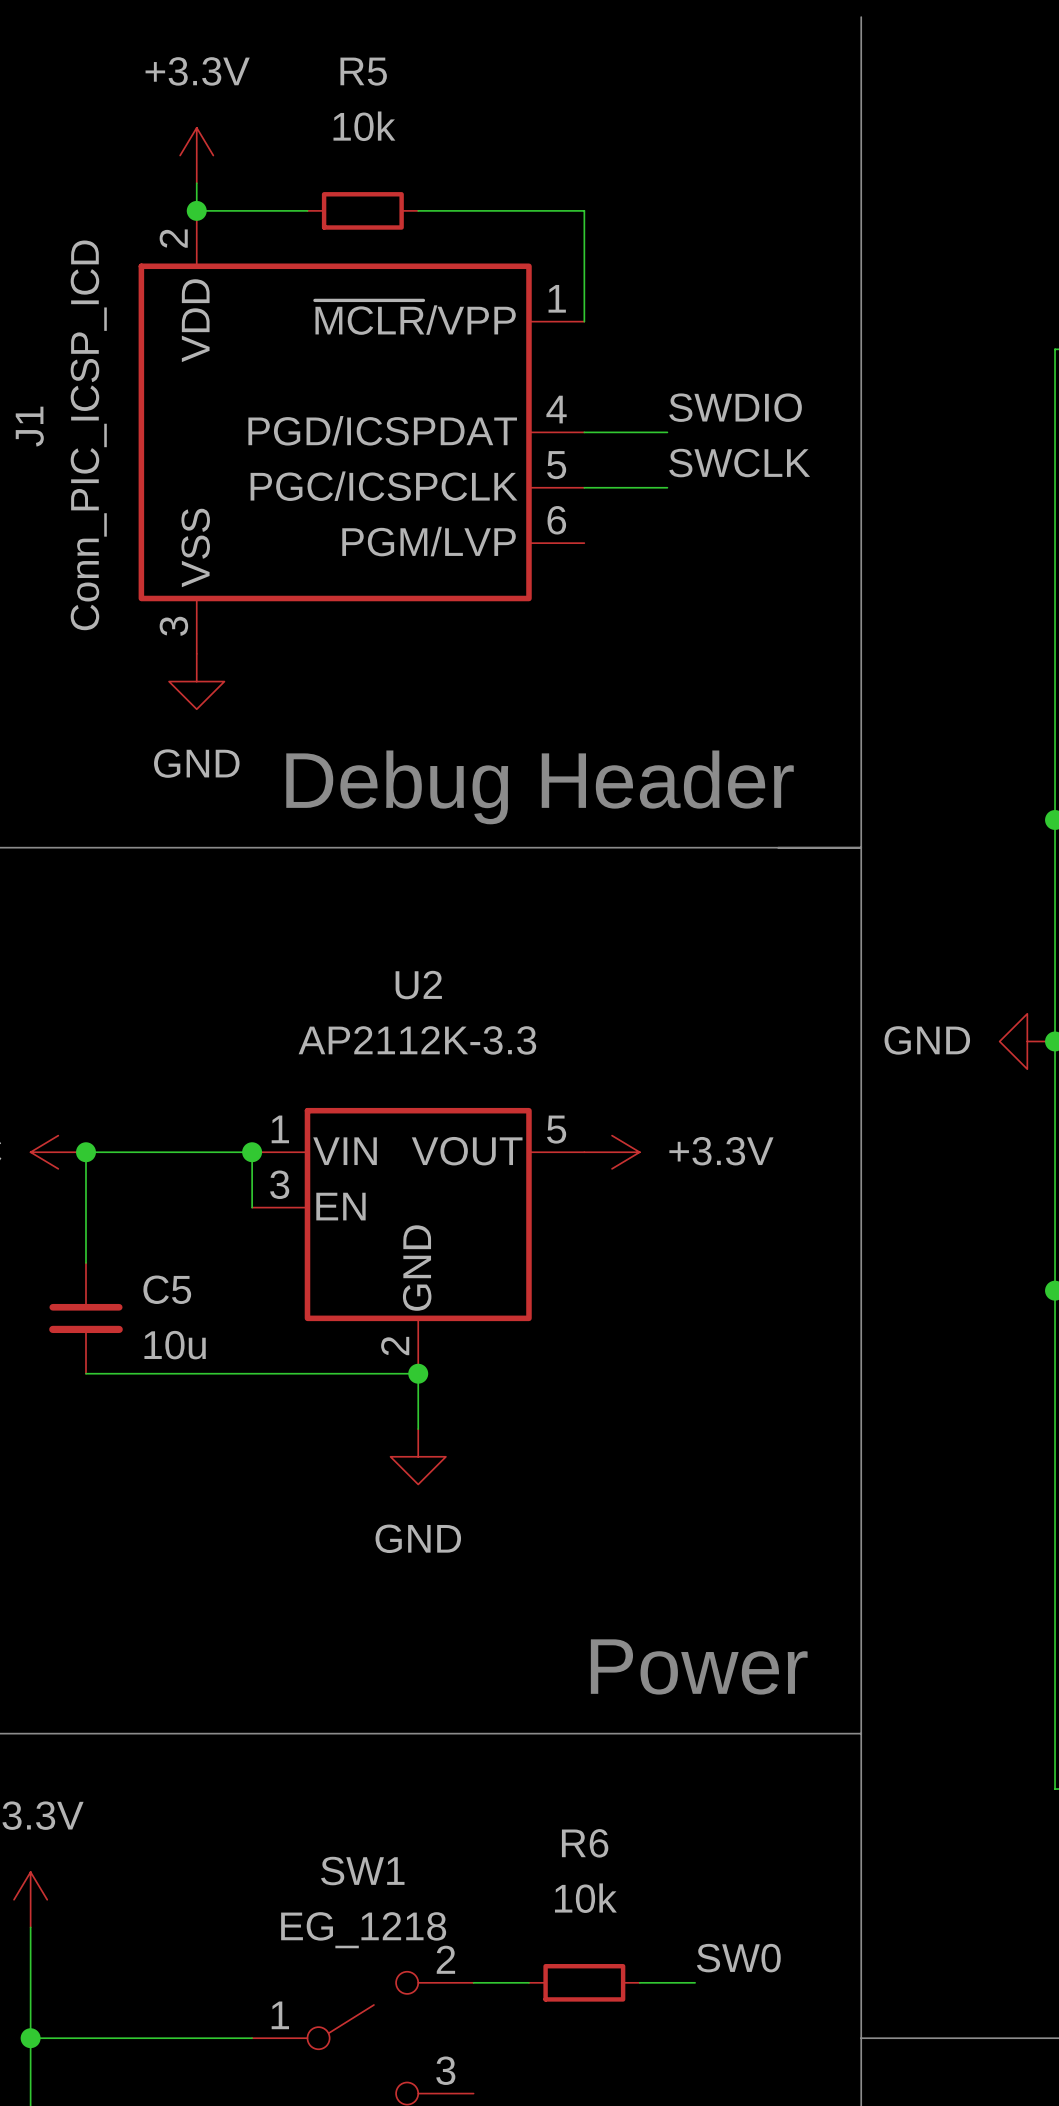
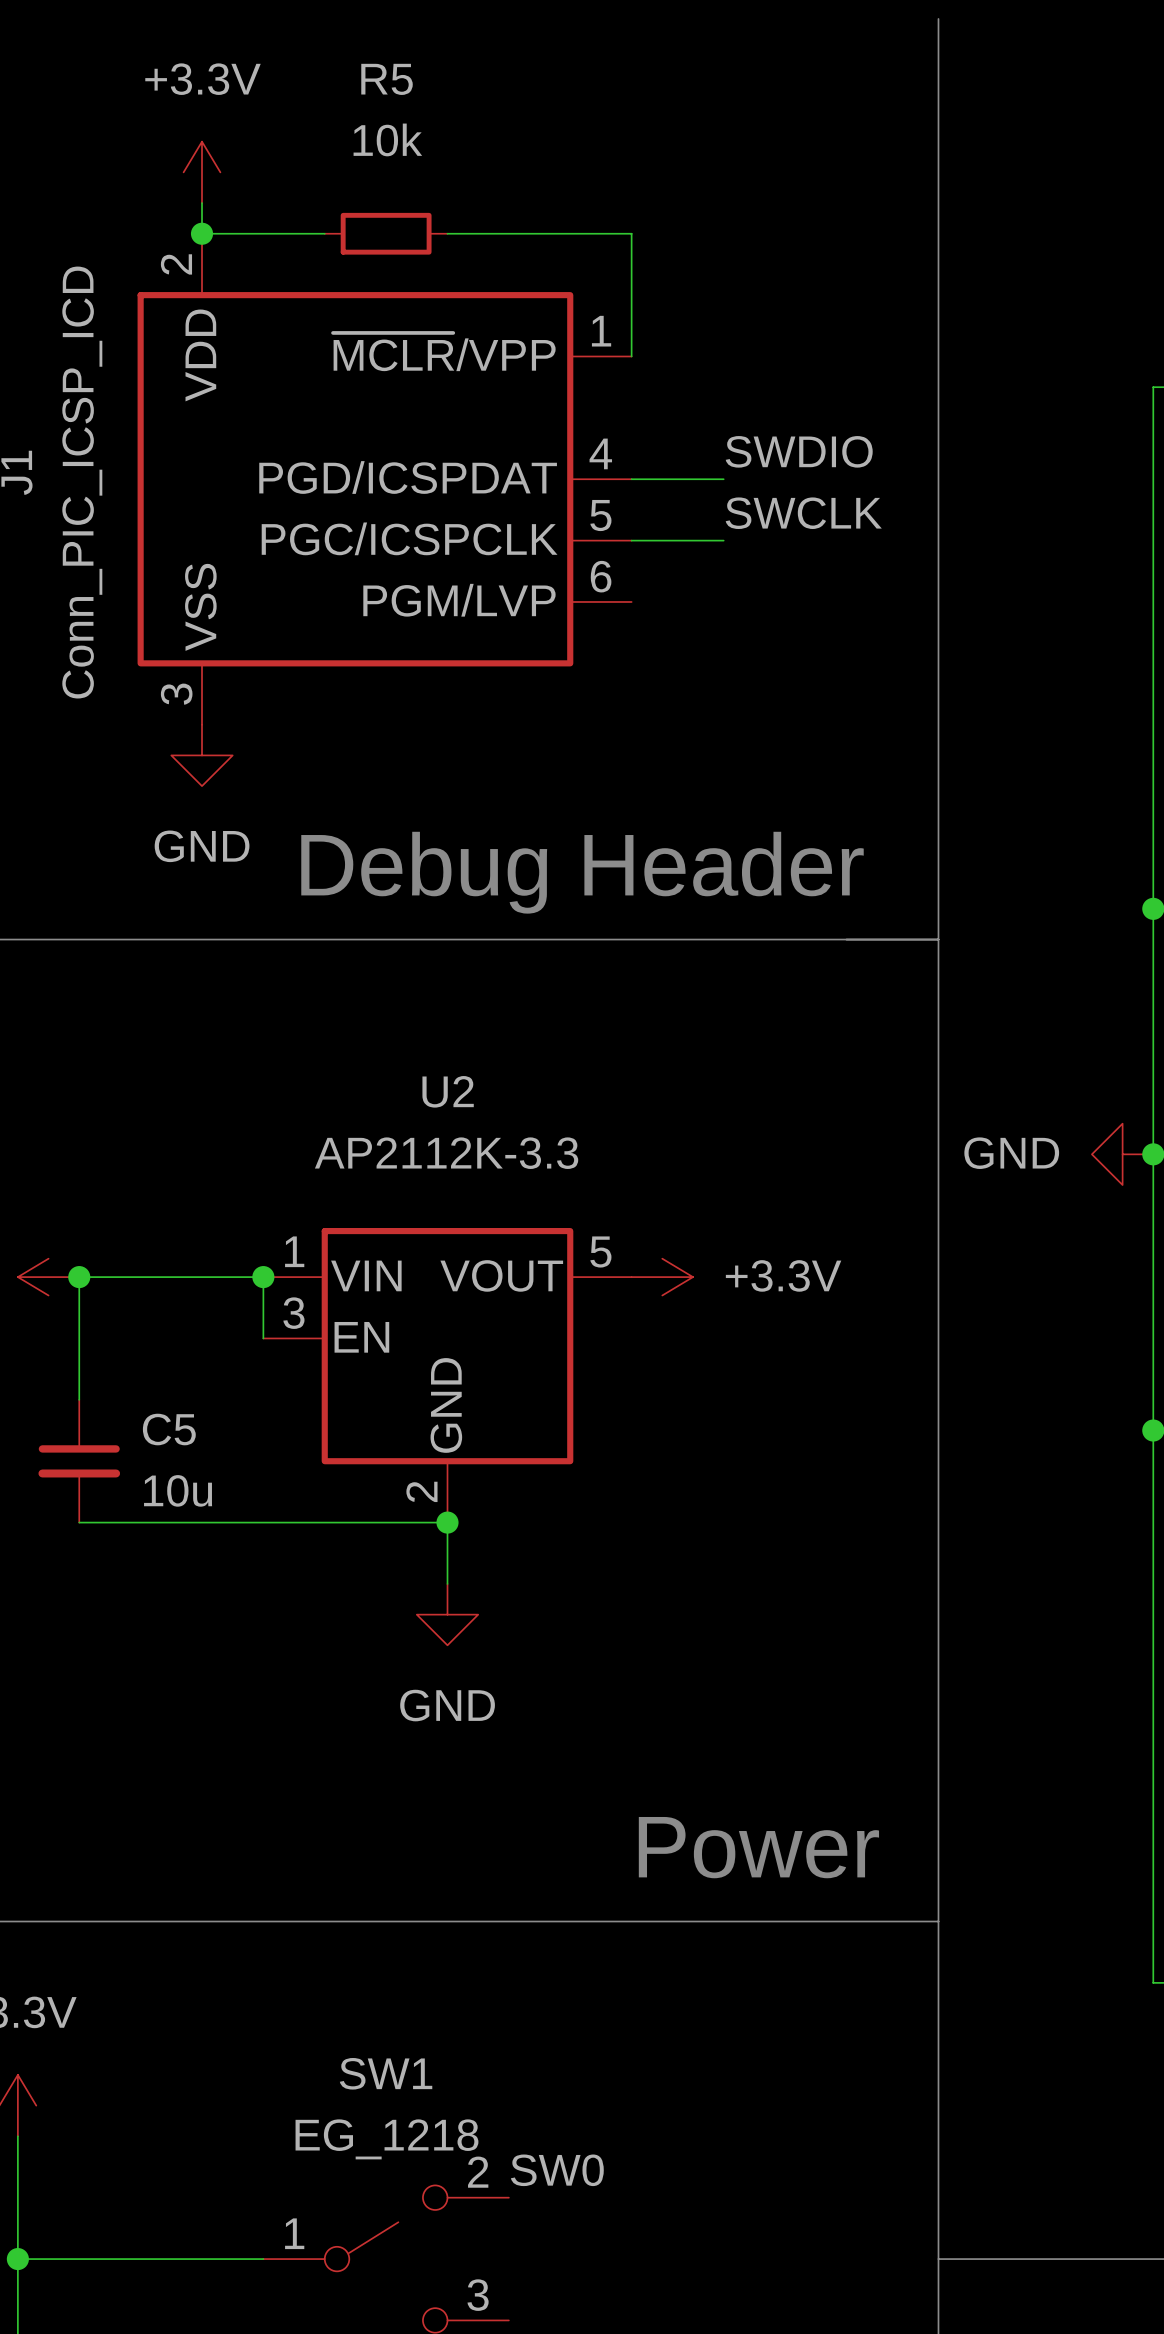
label position: SW0 (738, 1958) -> SW0 (557, 2170)
wire: (473, 1982) (528, 1982) -> none
R6: 10k (584, 1982) -> none
wire: (639, 1982) (695, 1982) -> none

